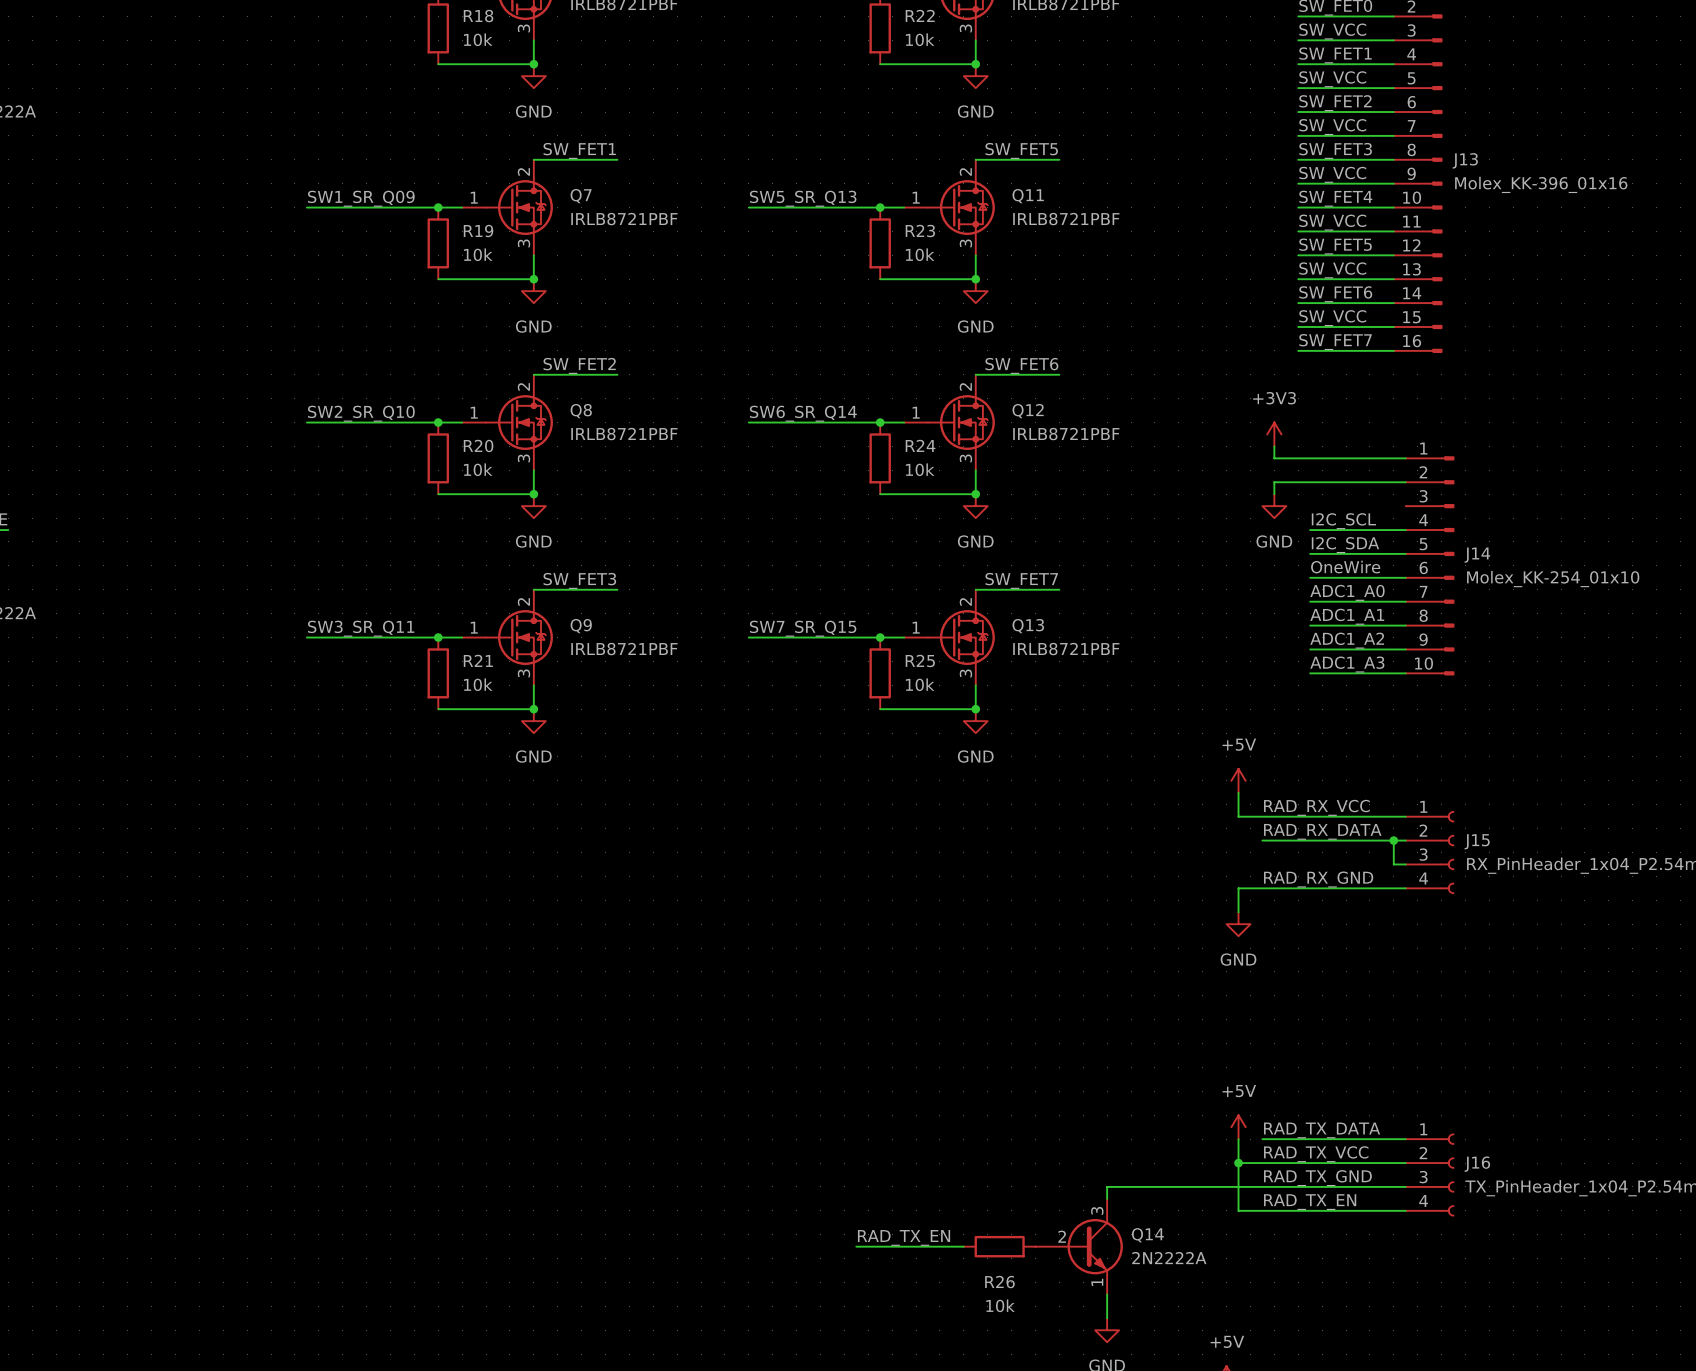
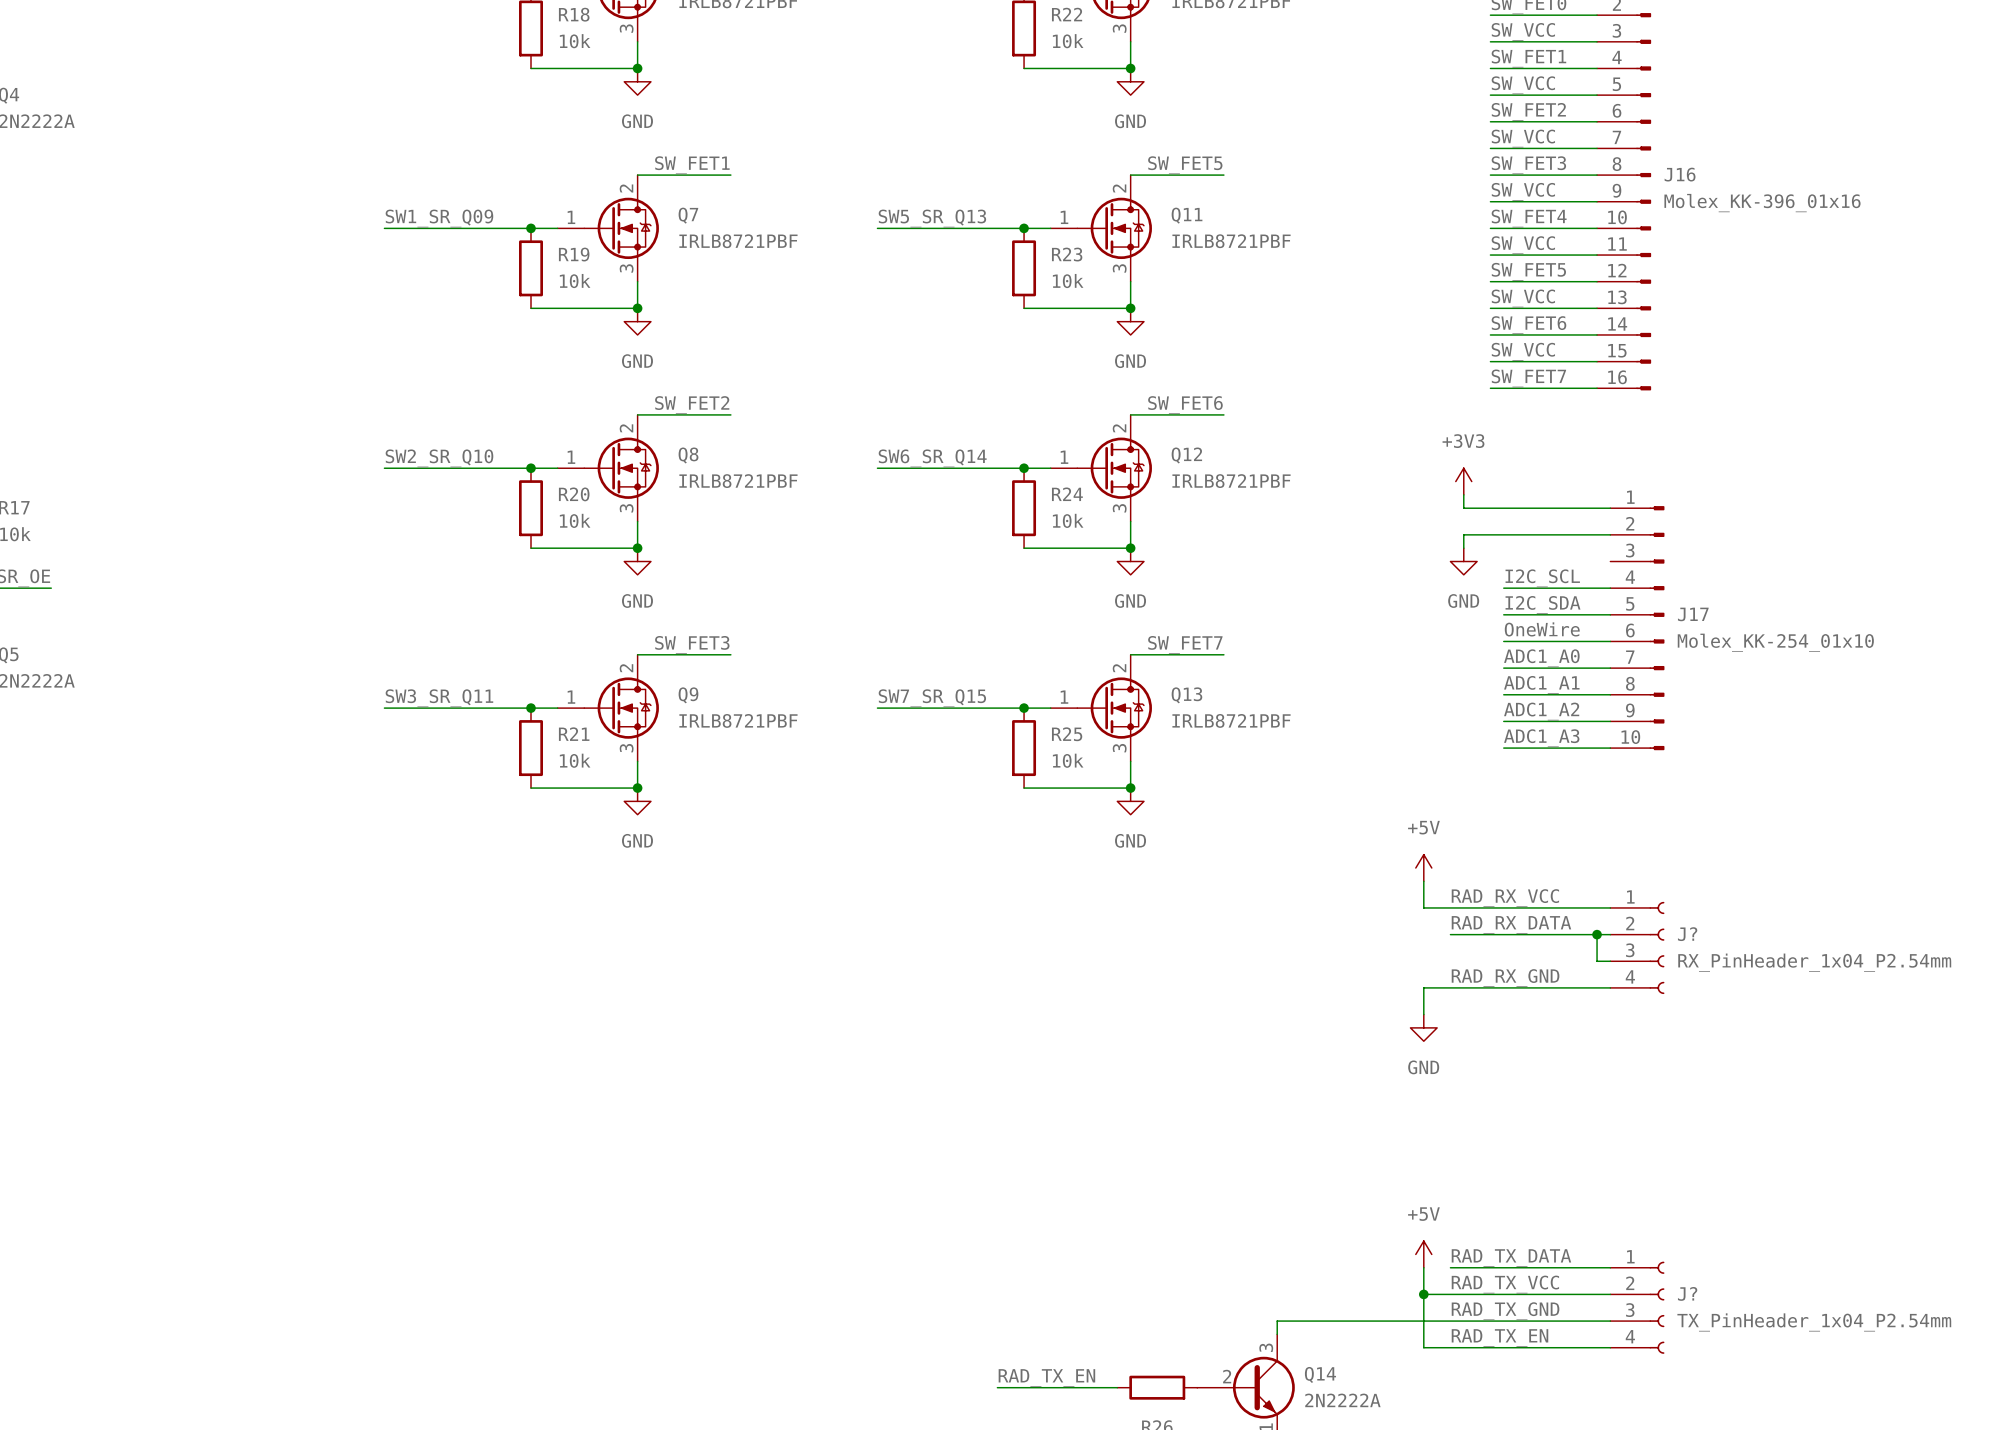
J13 name: J13 (1465, 160) -> J16 (1680, 174)
J14 name: J14 (1477, 555) -> J17 (1693, 614)
J15 name: J15 (1477, 841) -> J? (1687, 934)
J16 name: J16 (1477, 1164) -> J? (1687, 1293)

